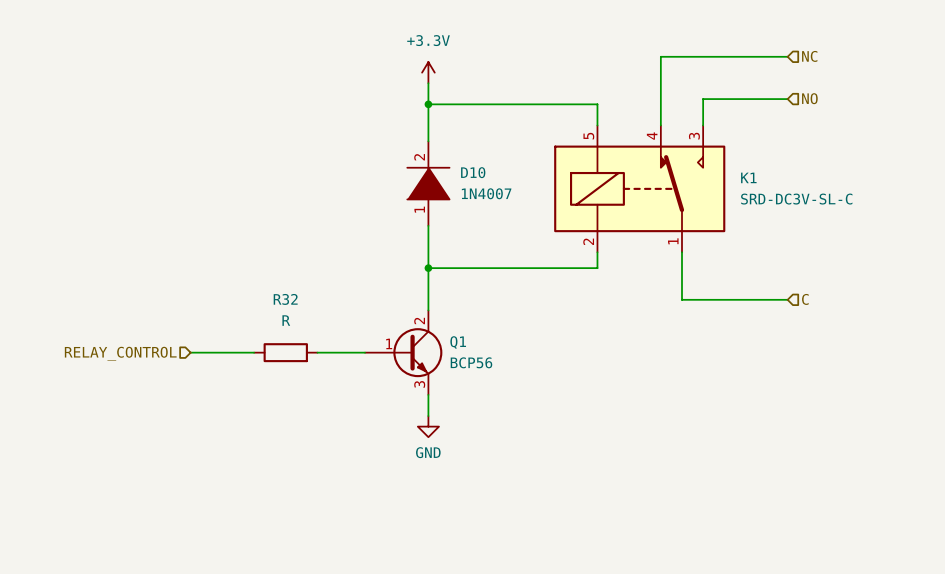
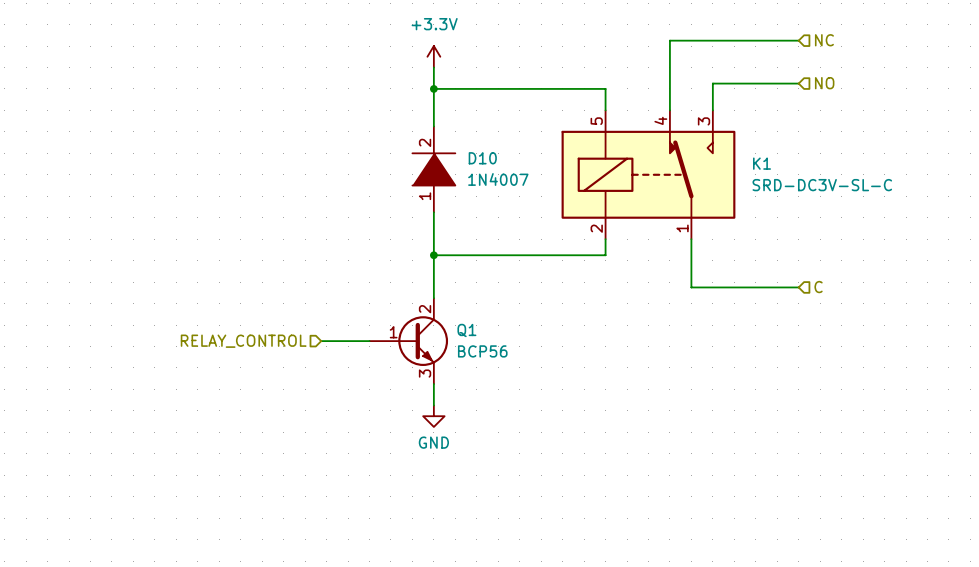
wire: (190, 352) (254, 352) -> none
R32: R (285, 352) -> none
hierarchical label position: RELAY_CONTROL (120, 353) -> RELAY_CONTROL (243, 341)

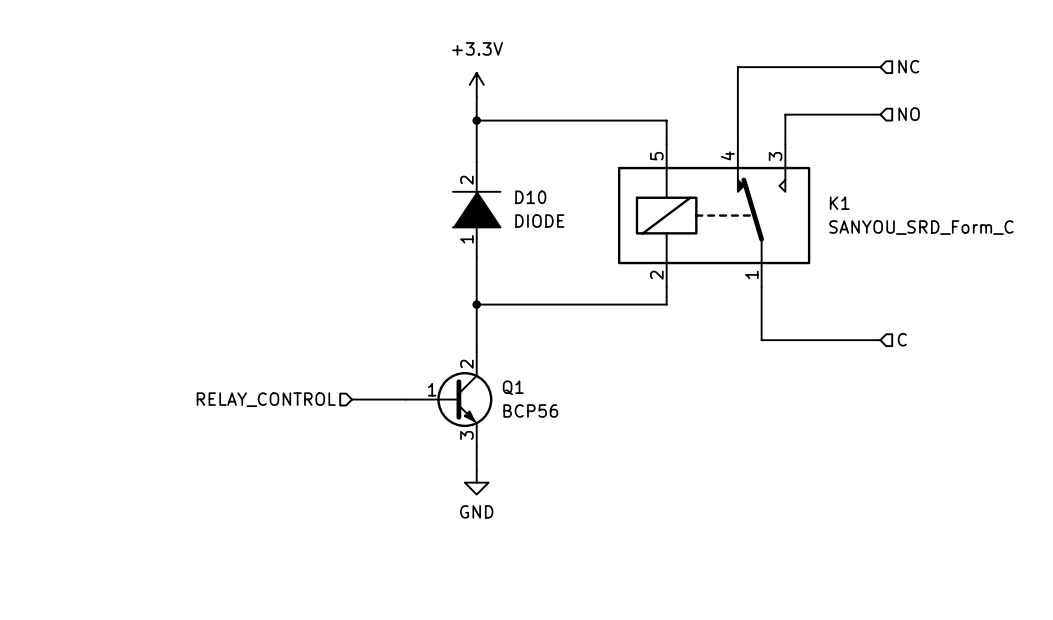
D10 value: 1N4007 (498, 179) -> DIODE (539, 221)
K1 value: SRD-DC3V-SL-C (822, 185) -> SANYOU_SRD_Form_C (921, 227)

